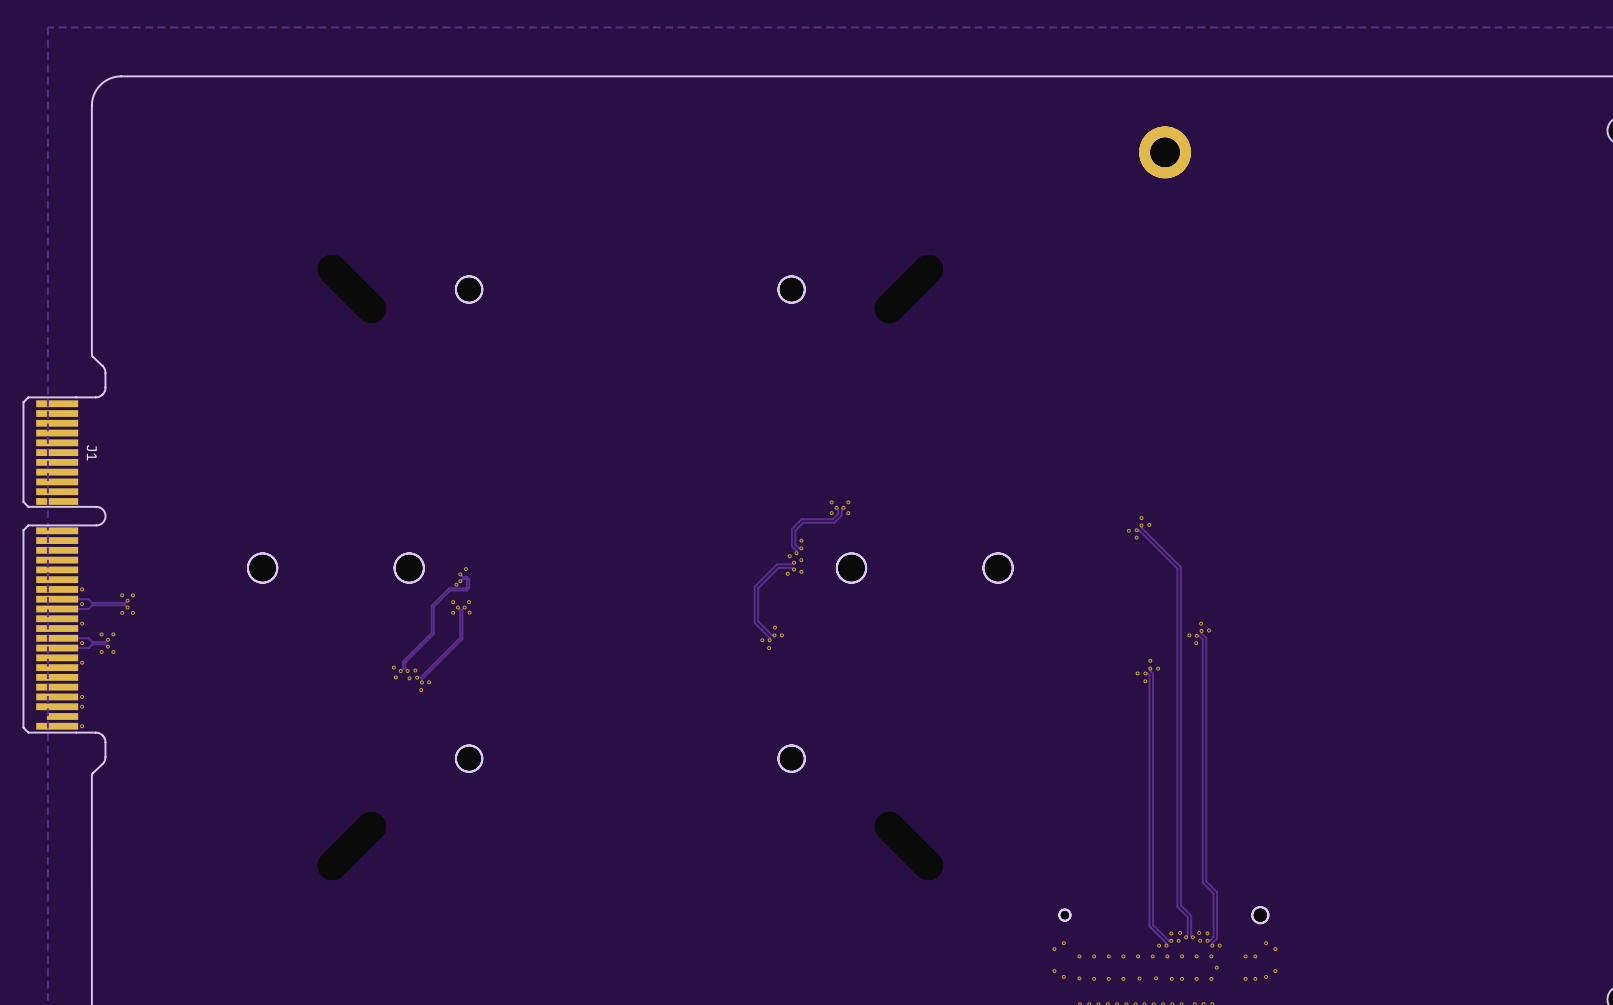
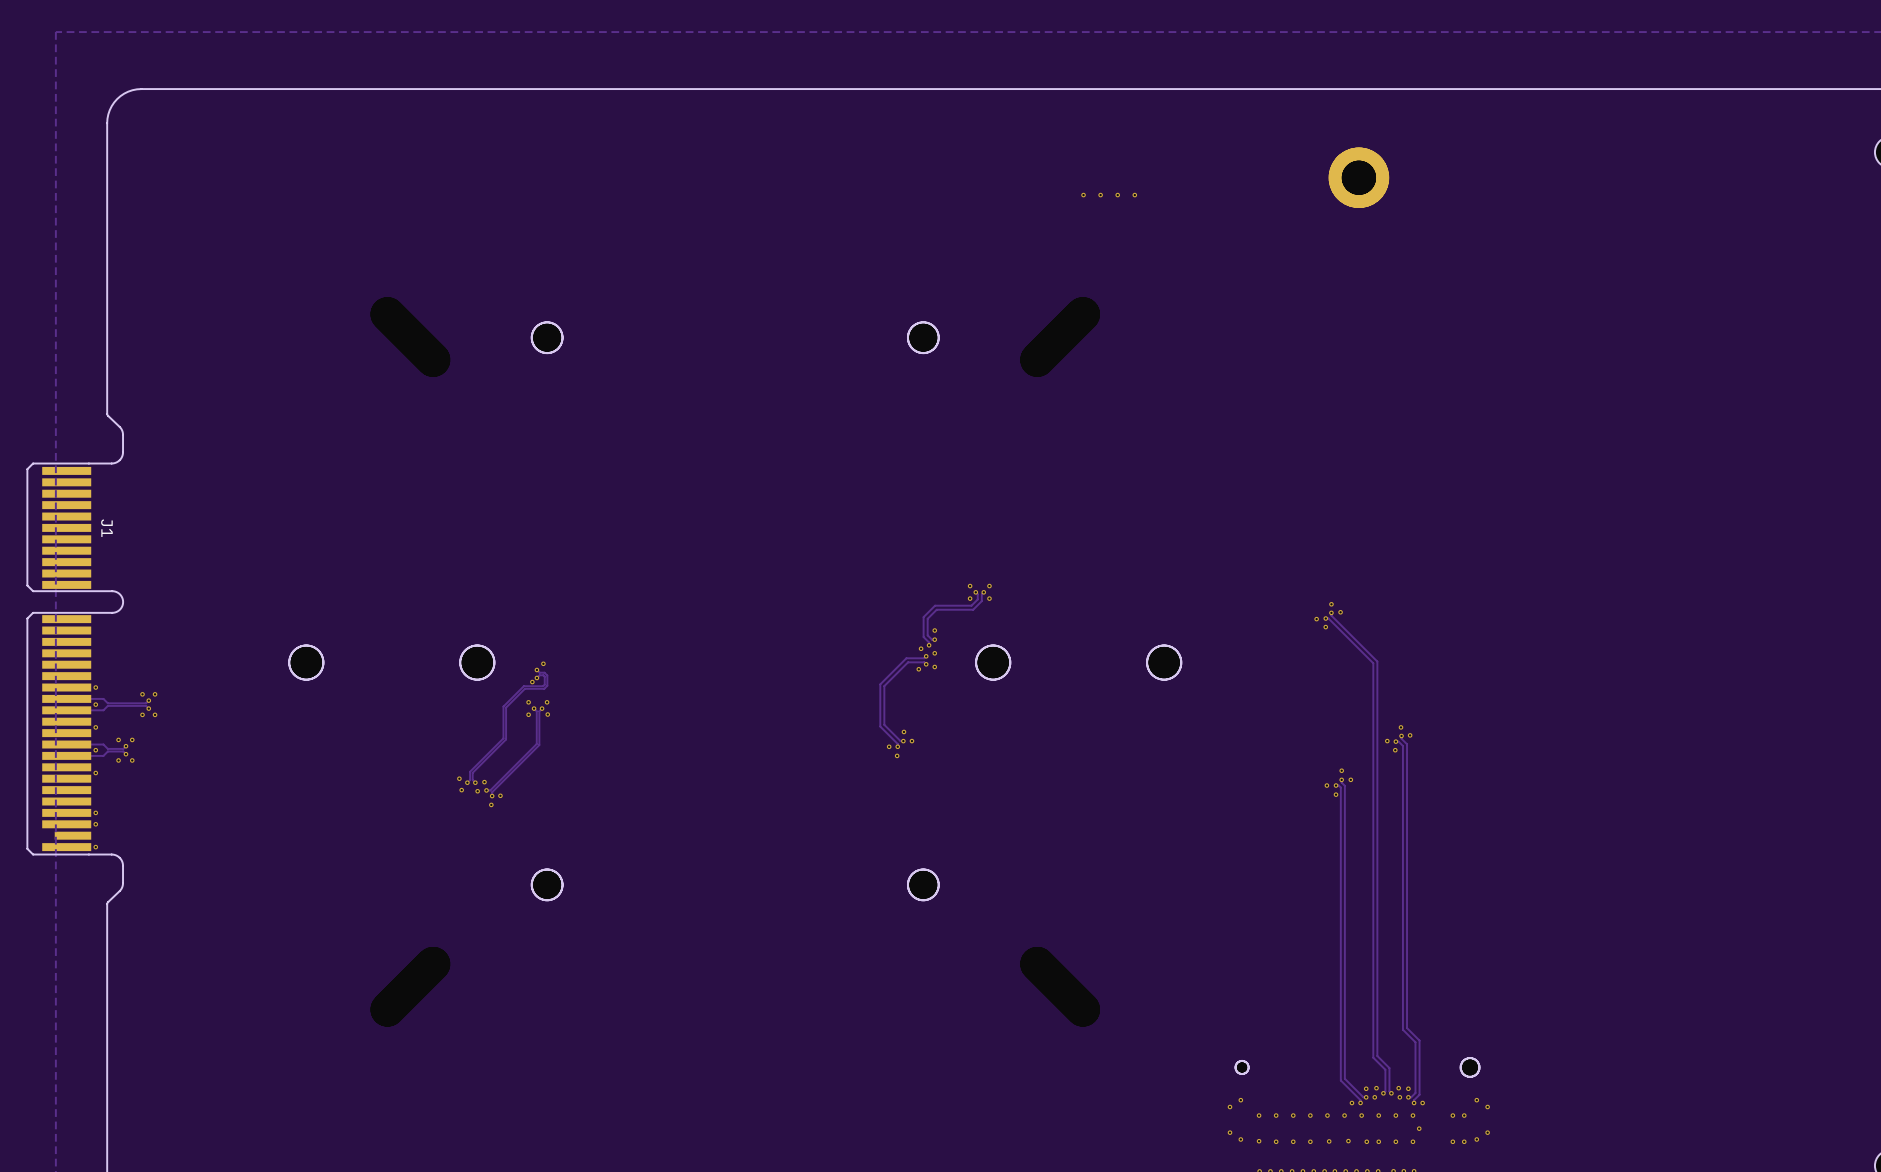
via: none -> (1083, 195)
via: none -> (1100, 195)
via: none -> (1117, 195)
via: none -> (1134, 195)

